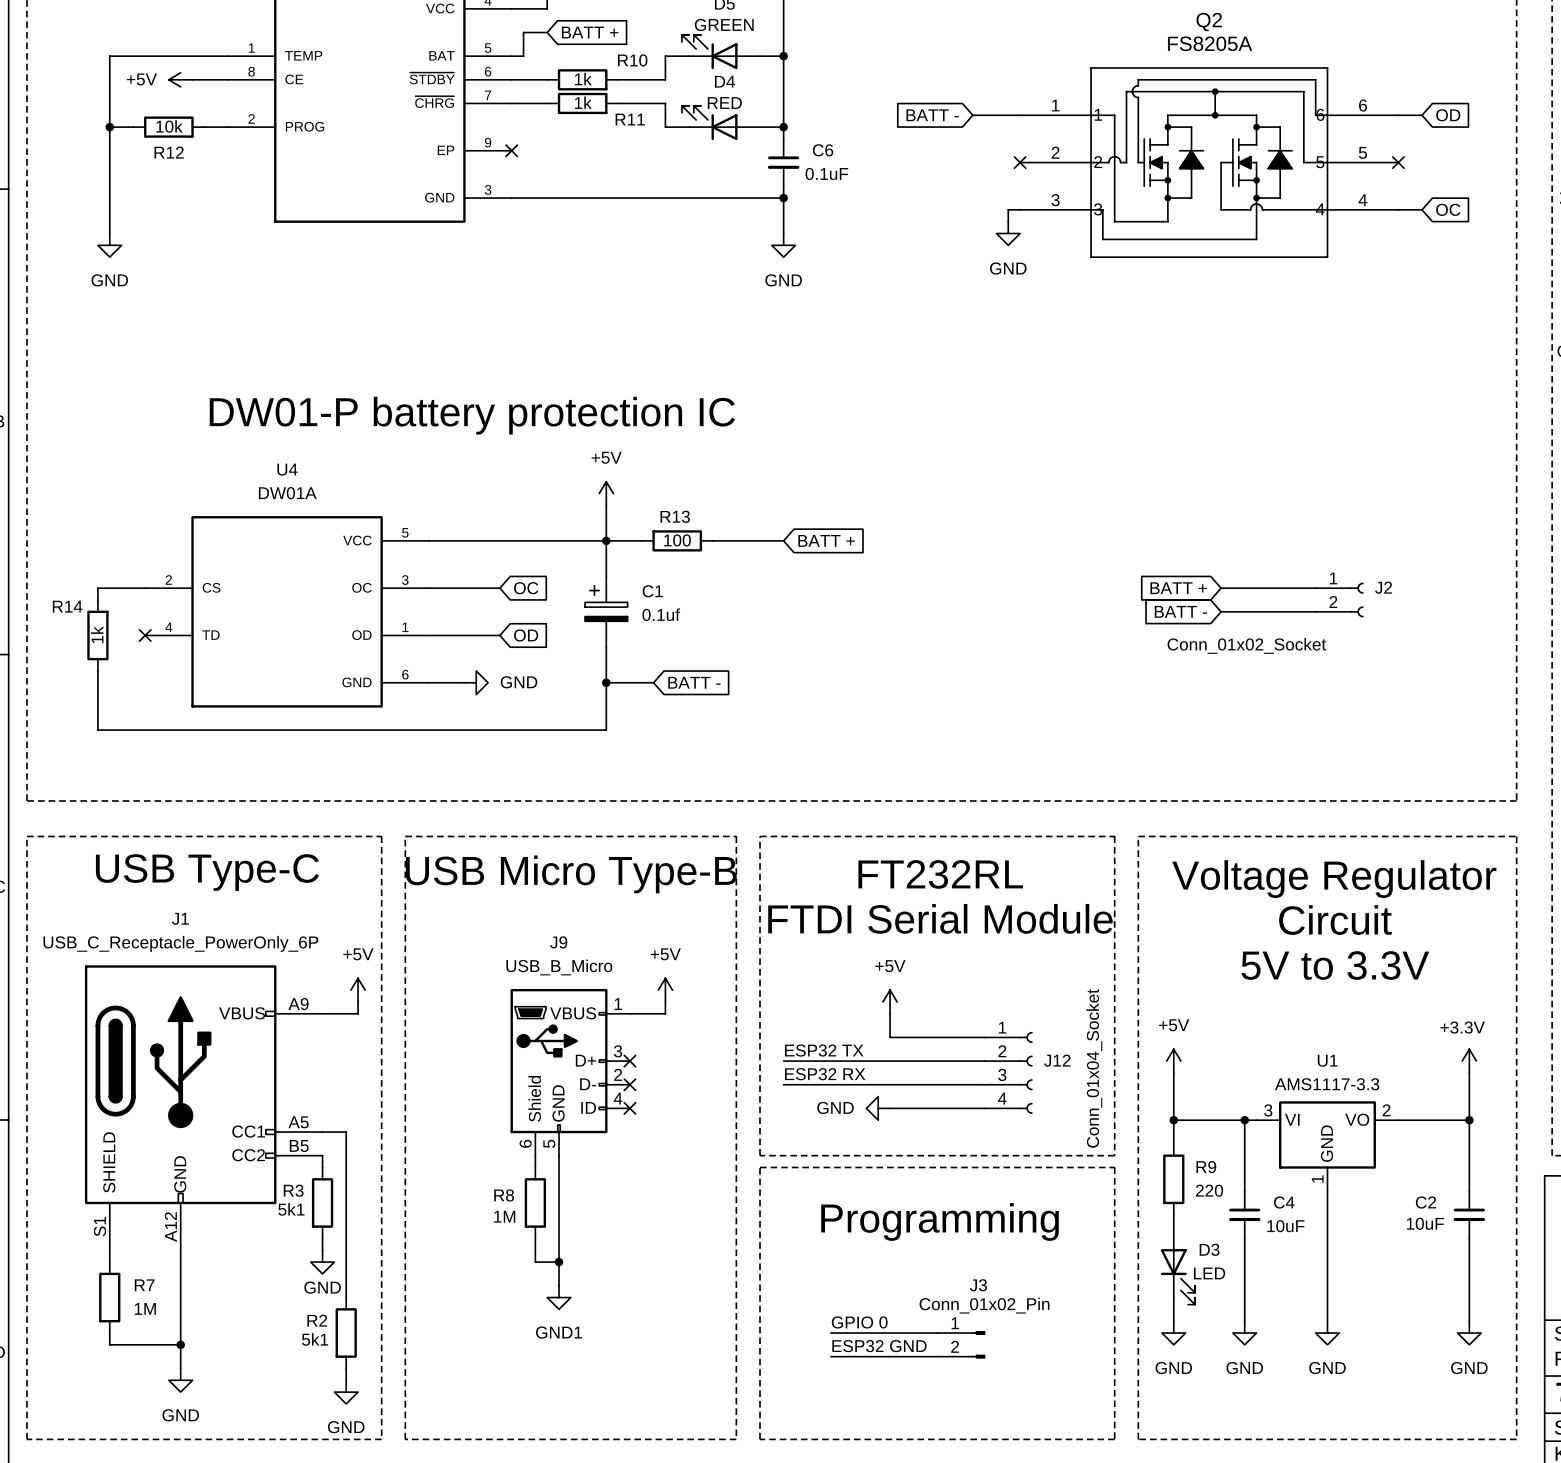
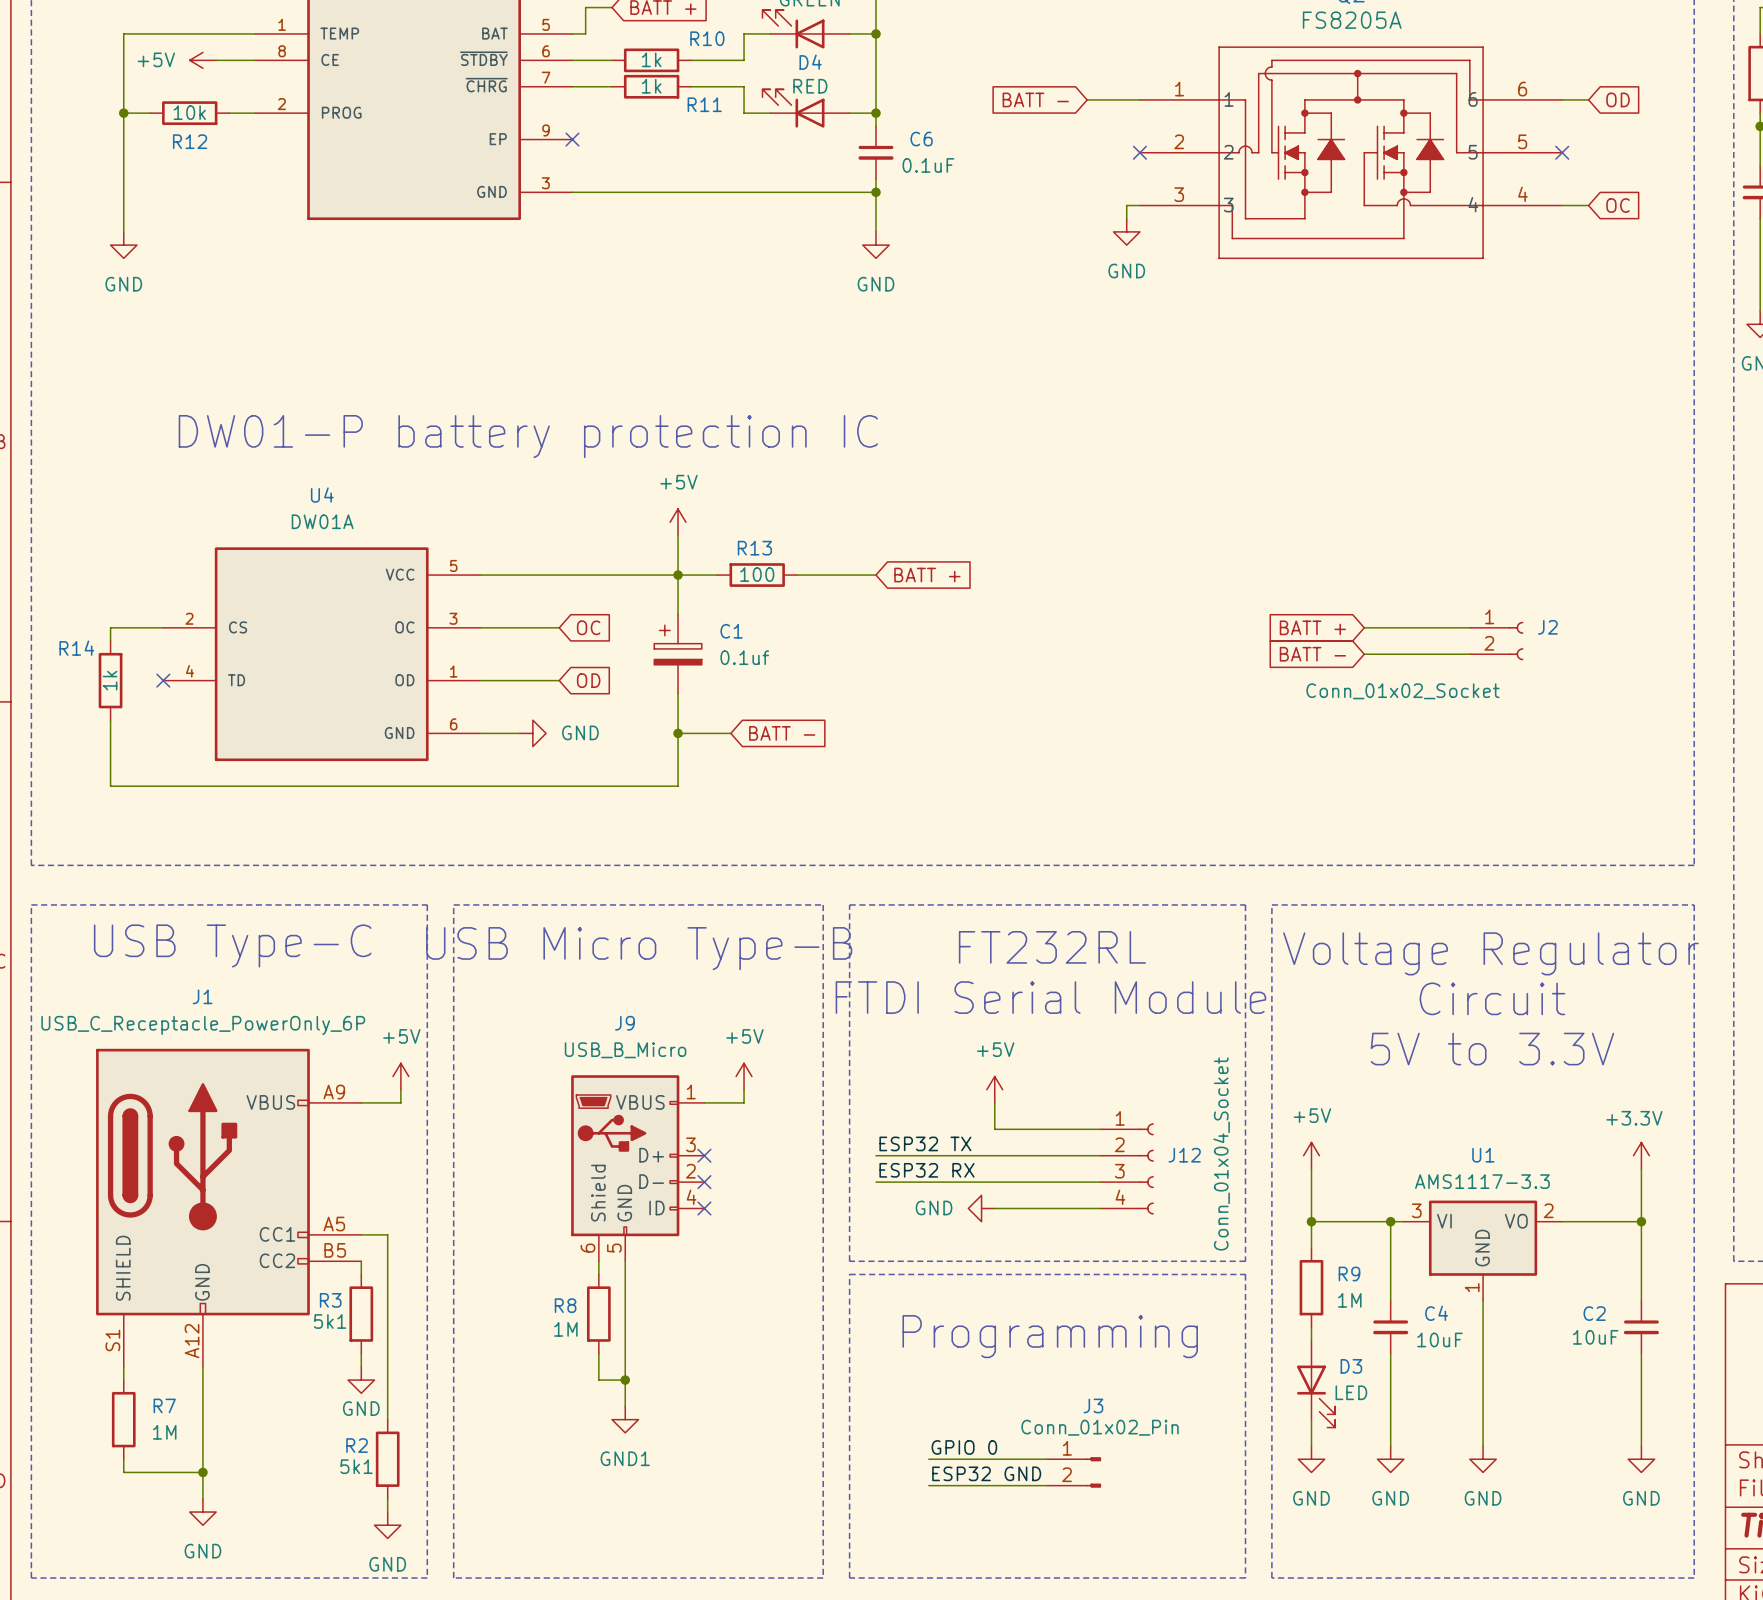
R9 value: 220 (1209, 1190) -> 1M (1349, 1300)

